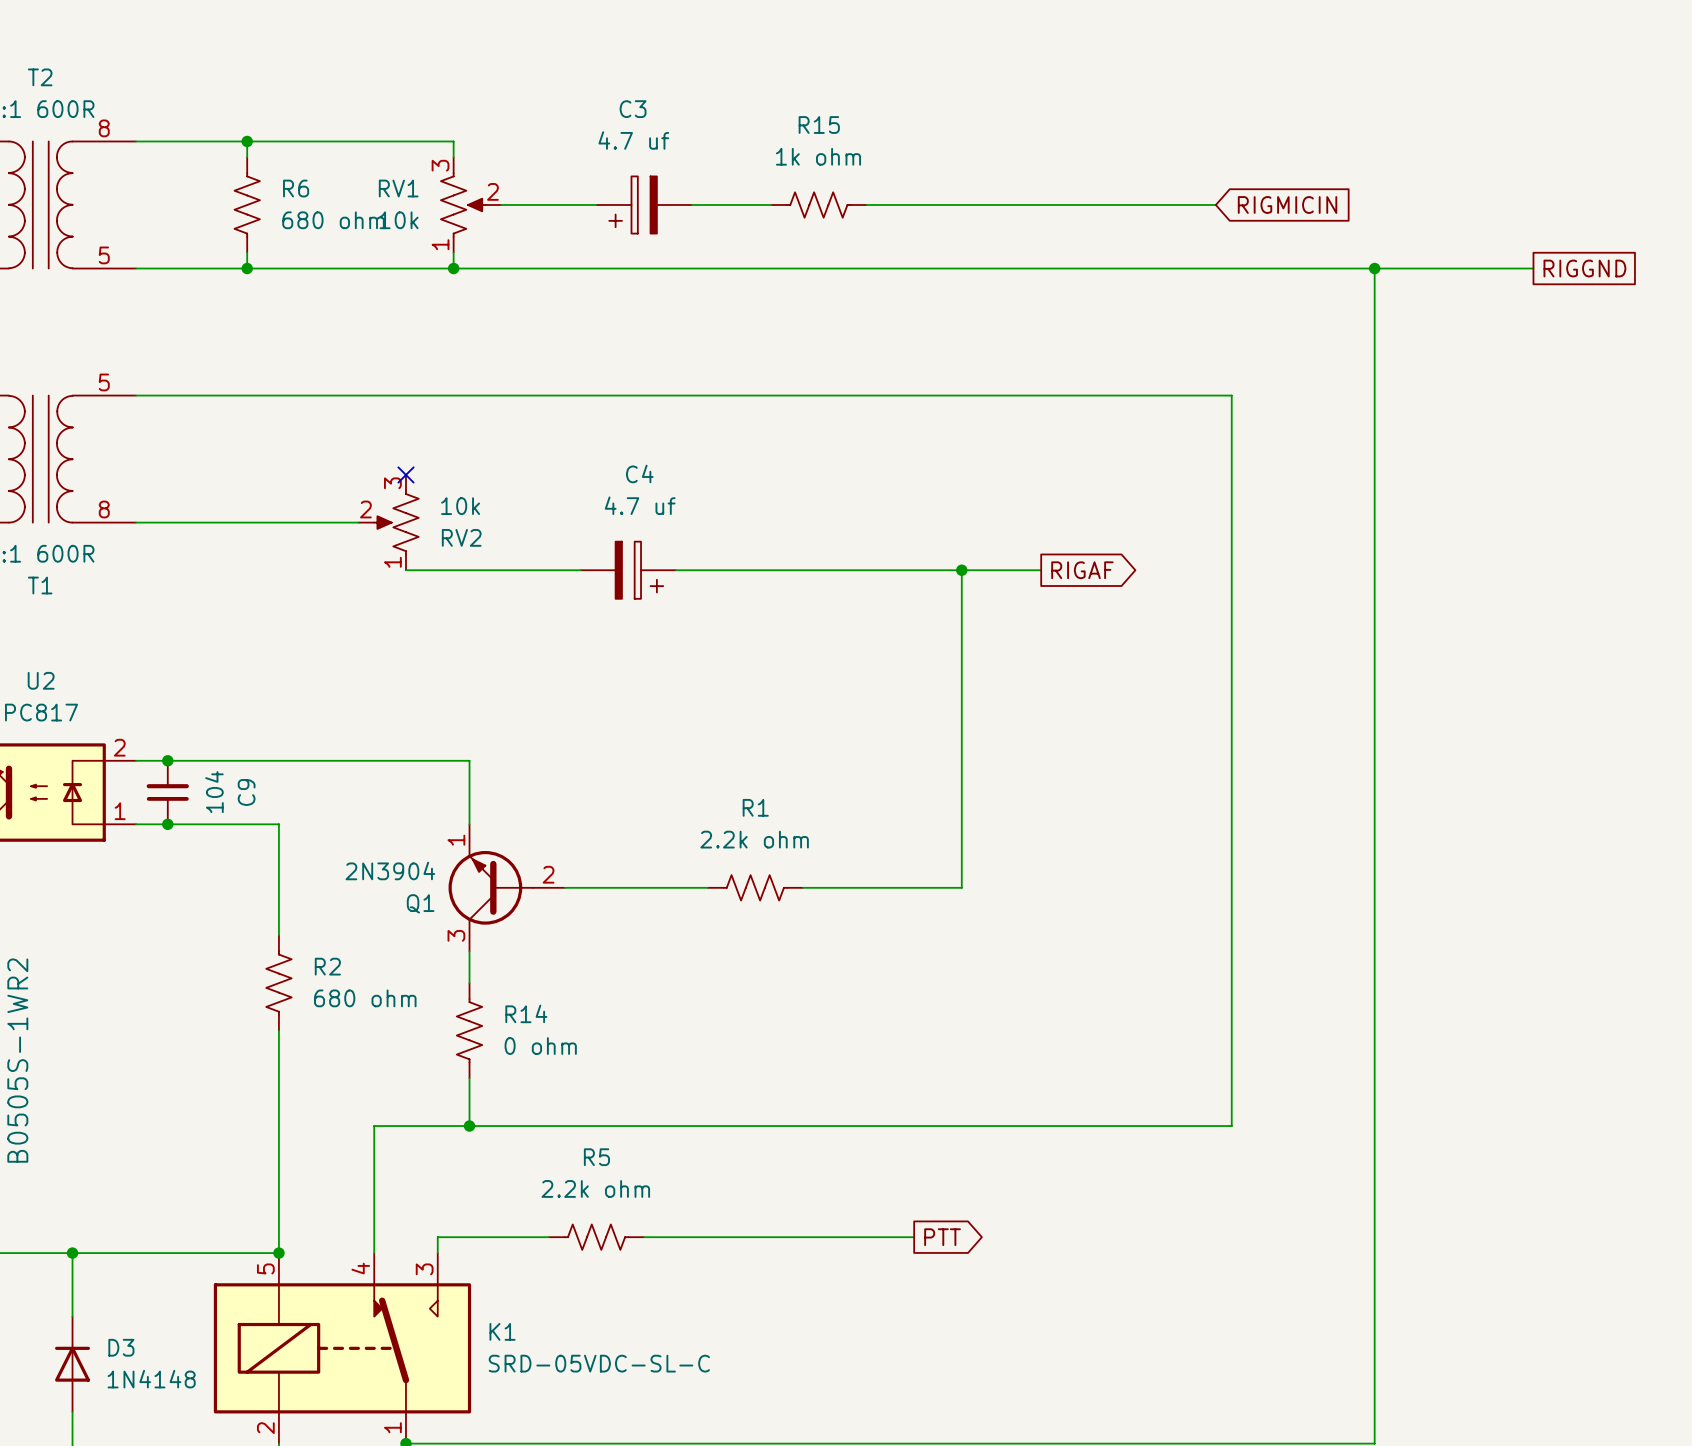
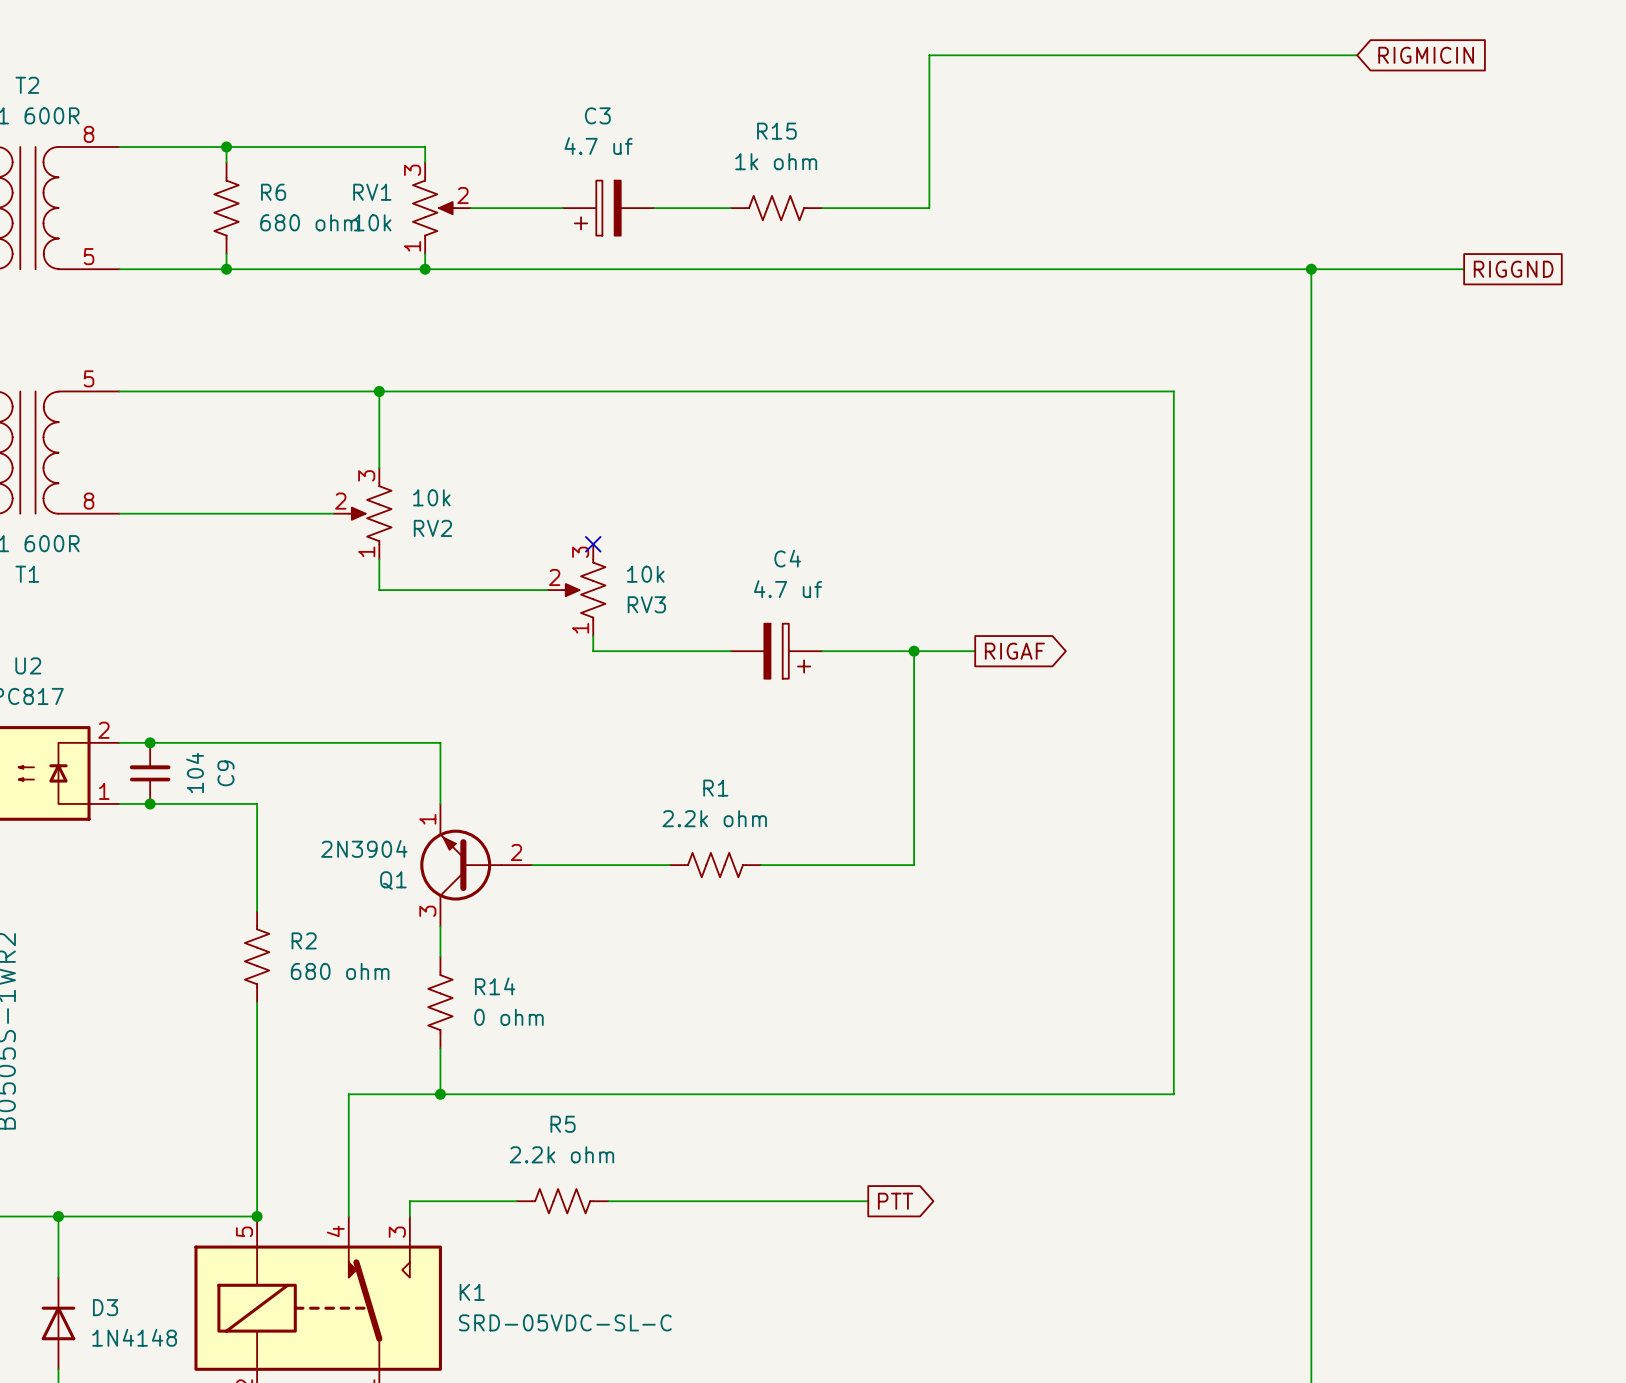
wire: (977, 205) (1215, 205) -> (929, 208) (929, 55) (1357, 55)
global label position: RIGMICIN (1287, 205) -> RIGMICIN (1426, 55)
wire: none -> (379, 391) (379, 467)
junction: none -> (379, 391)
no-connect mark: (405, 474) -> none
no-connect mark: none -> (593, 544)
wire: (405, 570) (580, 570) -> (379, 559) (379, 590) (547, 590)
C4 position: (628, 570) -> (776, 651)
wire: (675, 570) (1041, 570) -> none
wire: (961, 570) (961, 665) -> none
junction: (961, 570) -> none
global label position: RIGAF (1082, 570) -> RIGAF (1014, 651)
RV3: none -> 10k (576, 590)
wire: none -> (593, 635) (593, 651) (730, 651)
wire: none -> (822, 651) (975, 651)
junction: none -> (914, 651)

